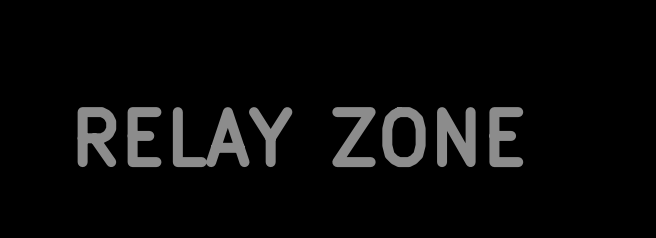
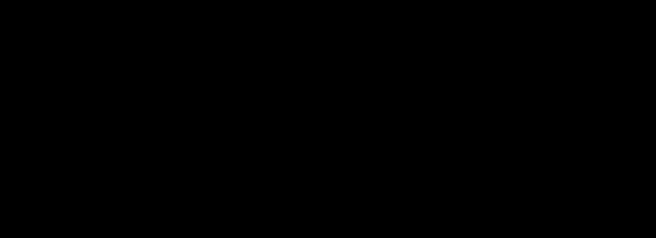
text: RELAY ZONE (300, 137) -> none

